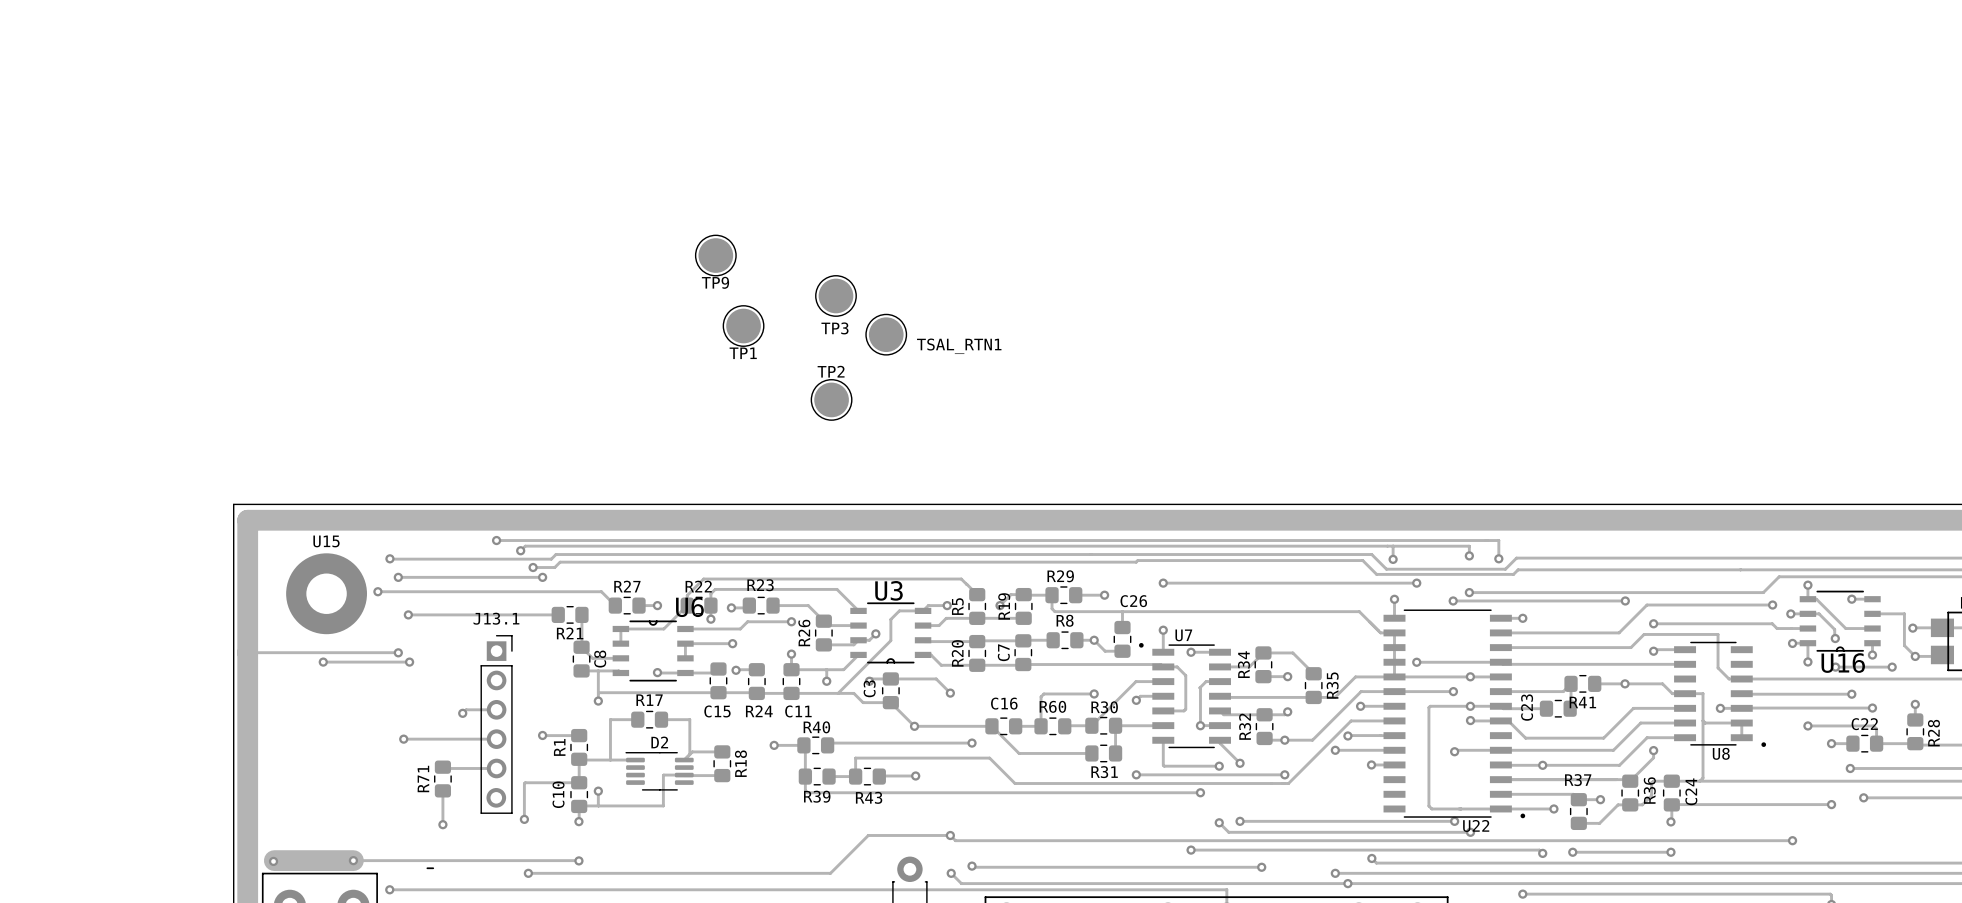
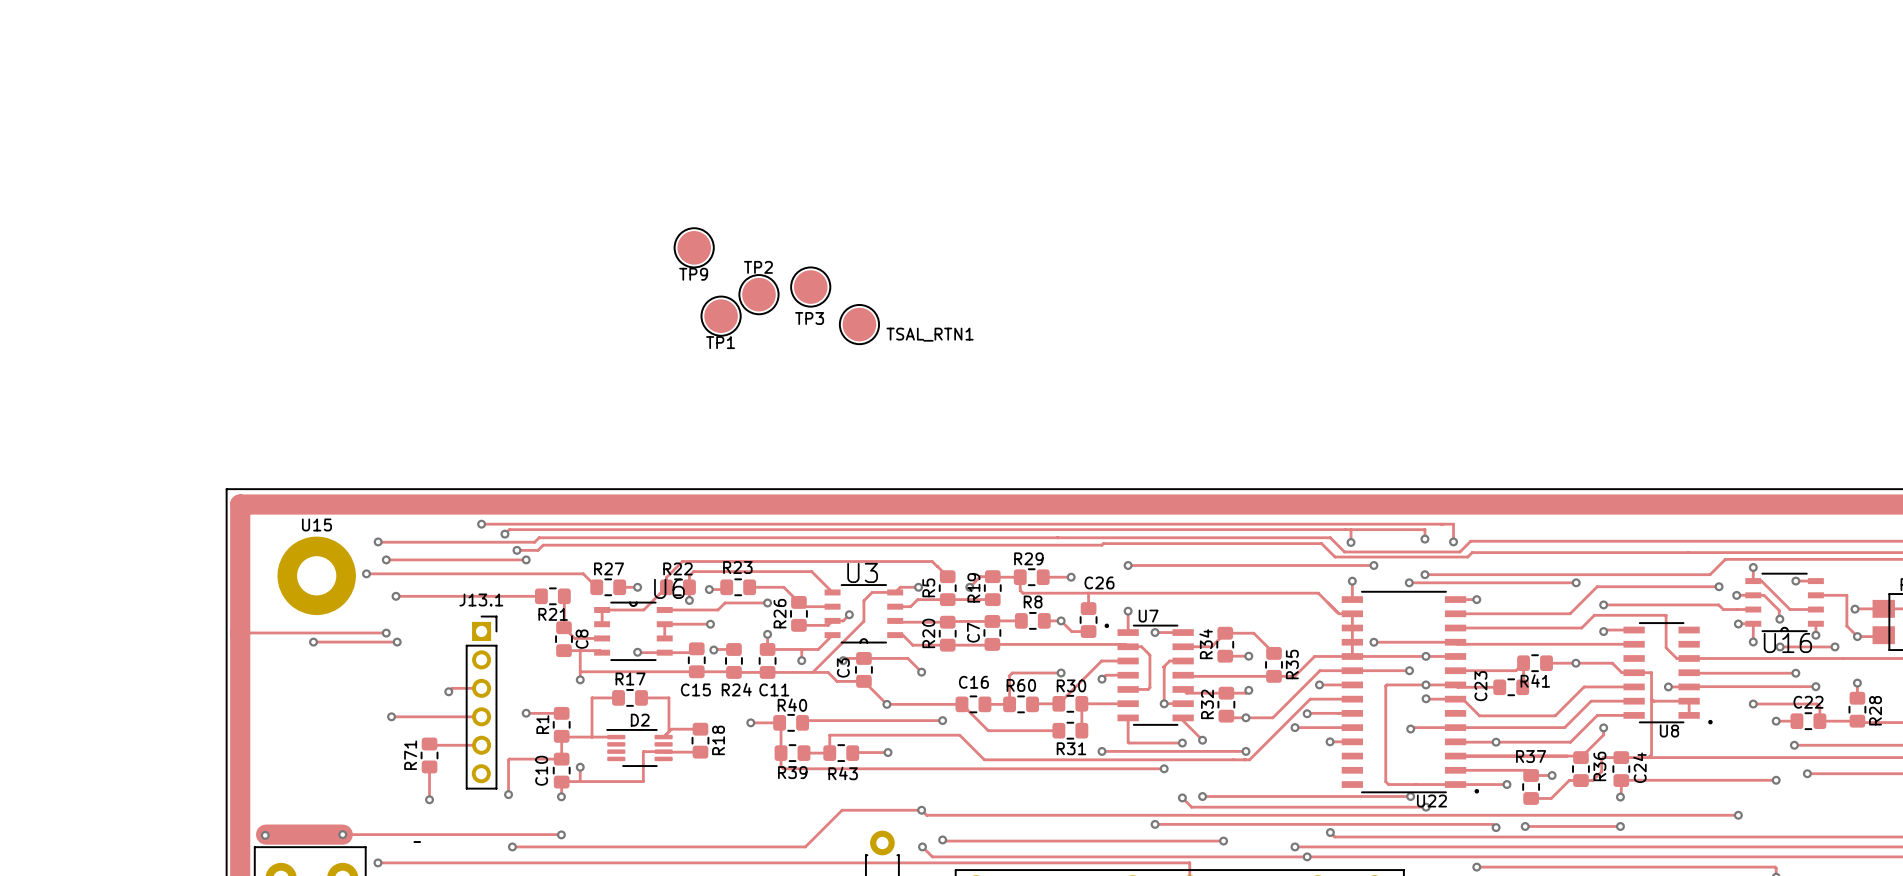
TP2 position: (831, 399) -> (758, 294)

